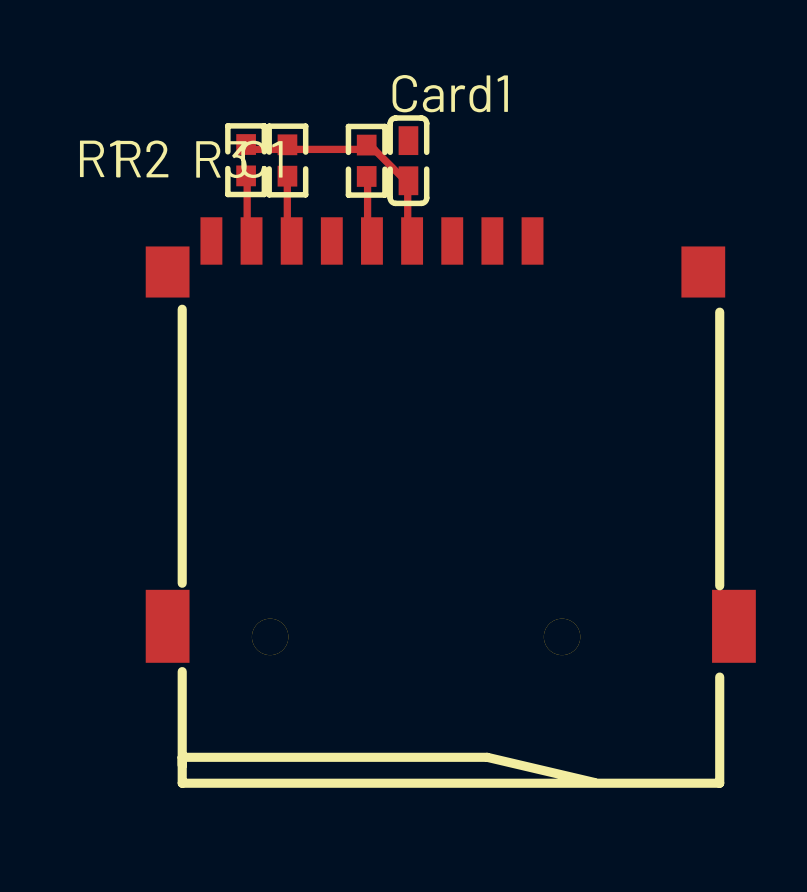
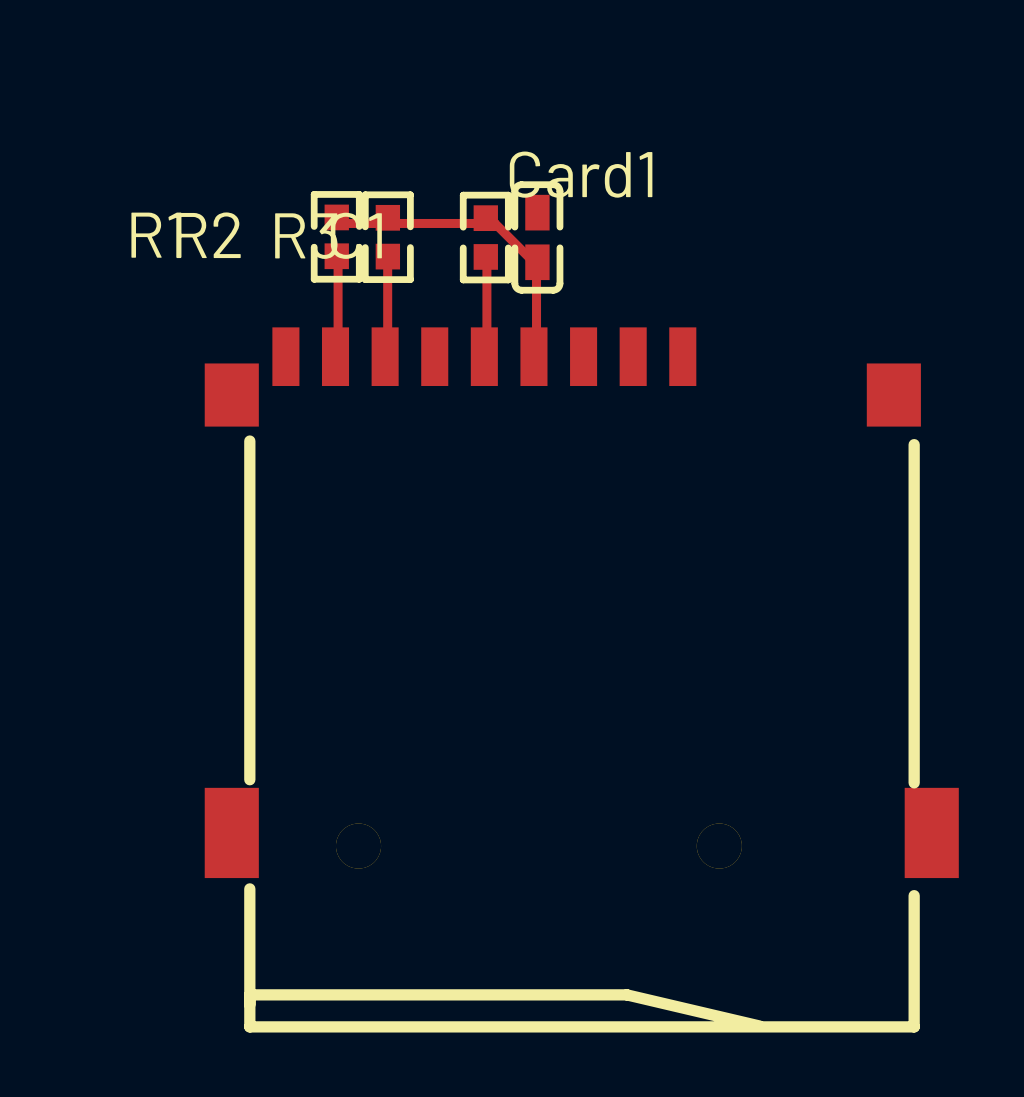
Card1 position: (450, 502) -> (581, 679)

